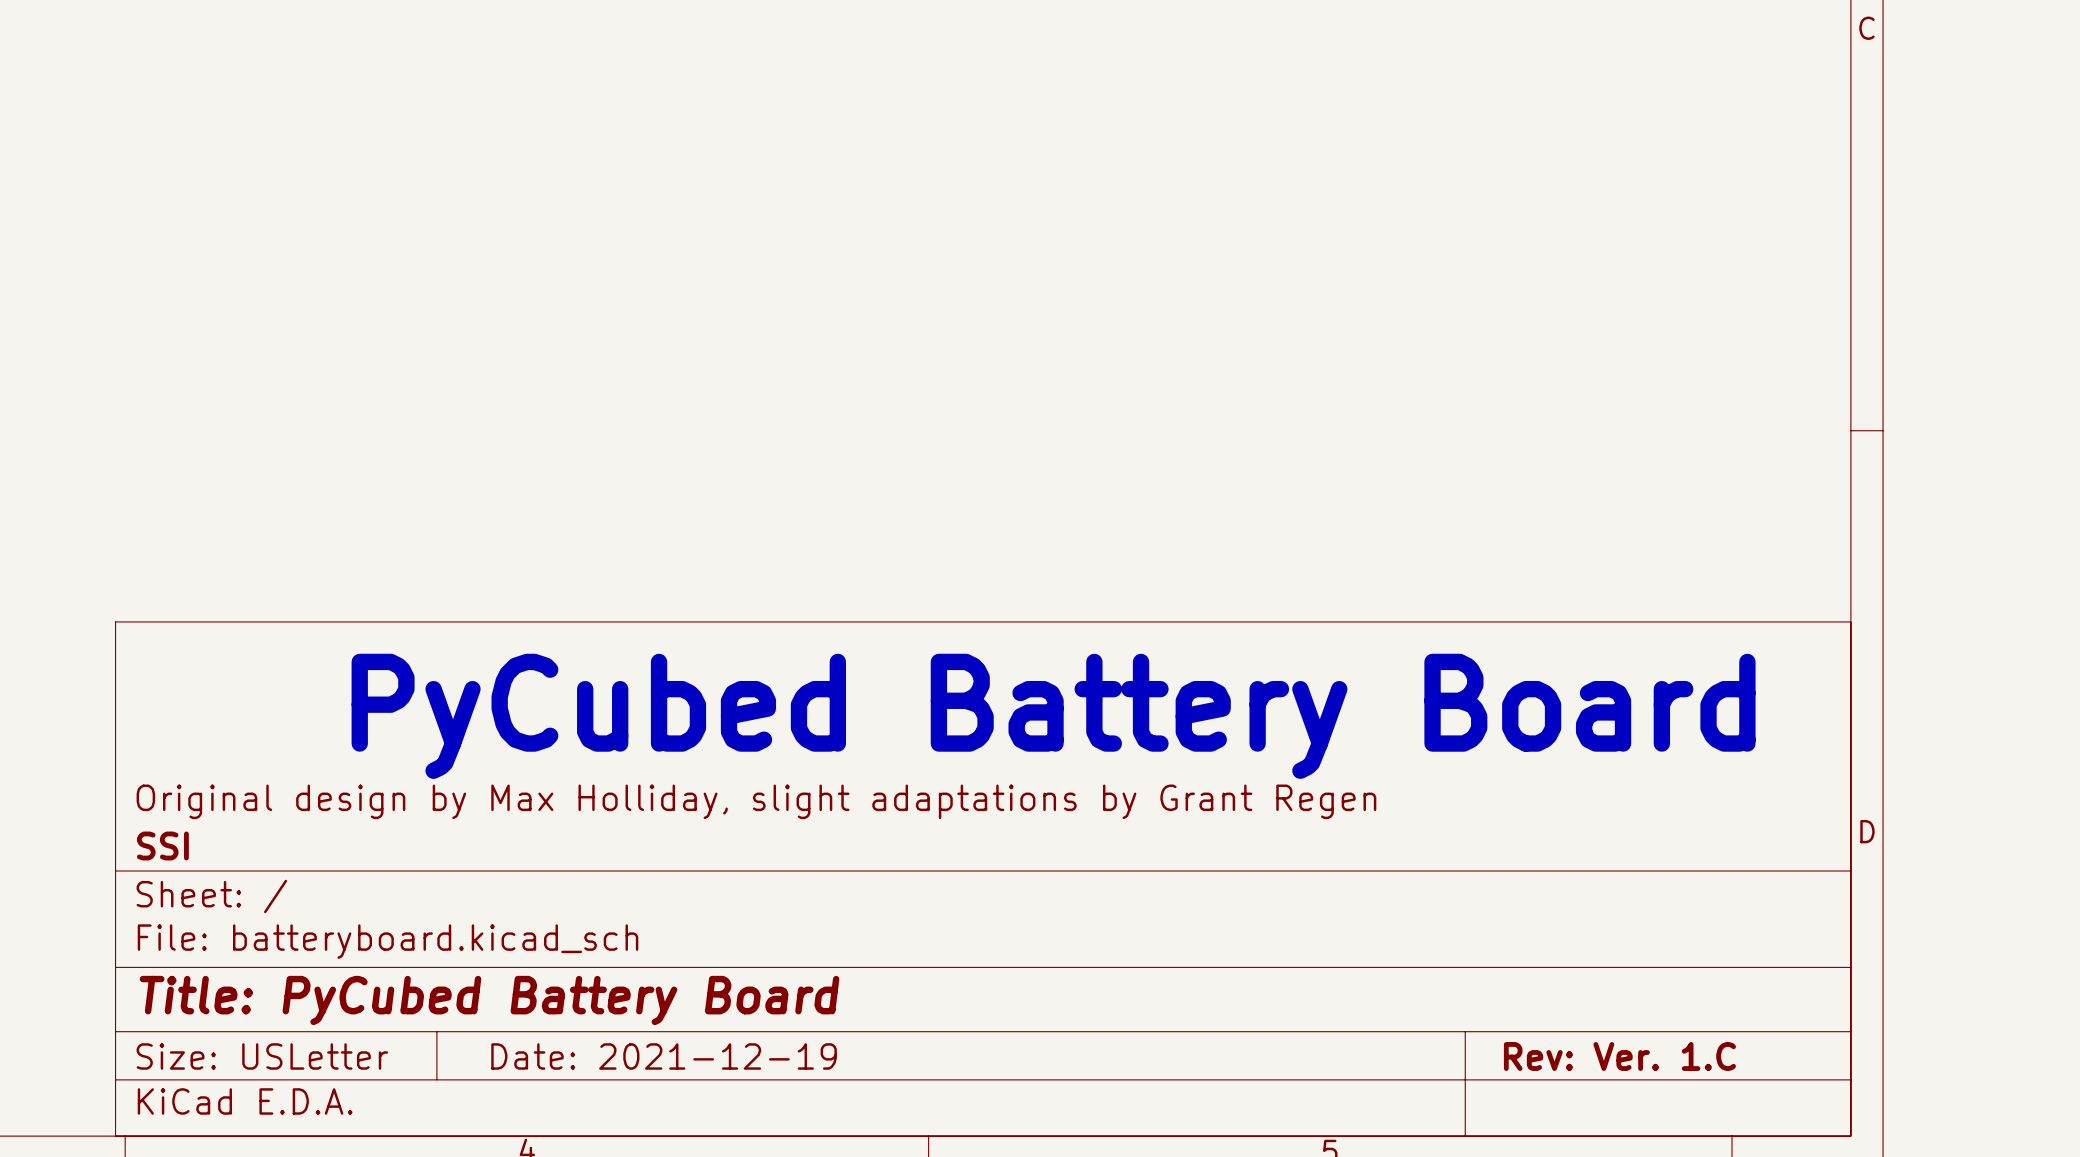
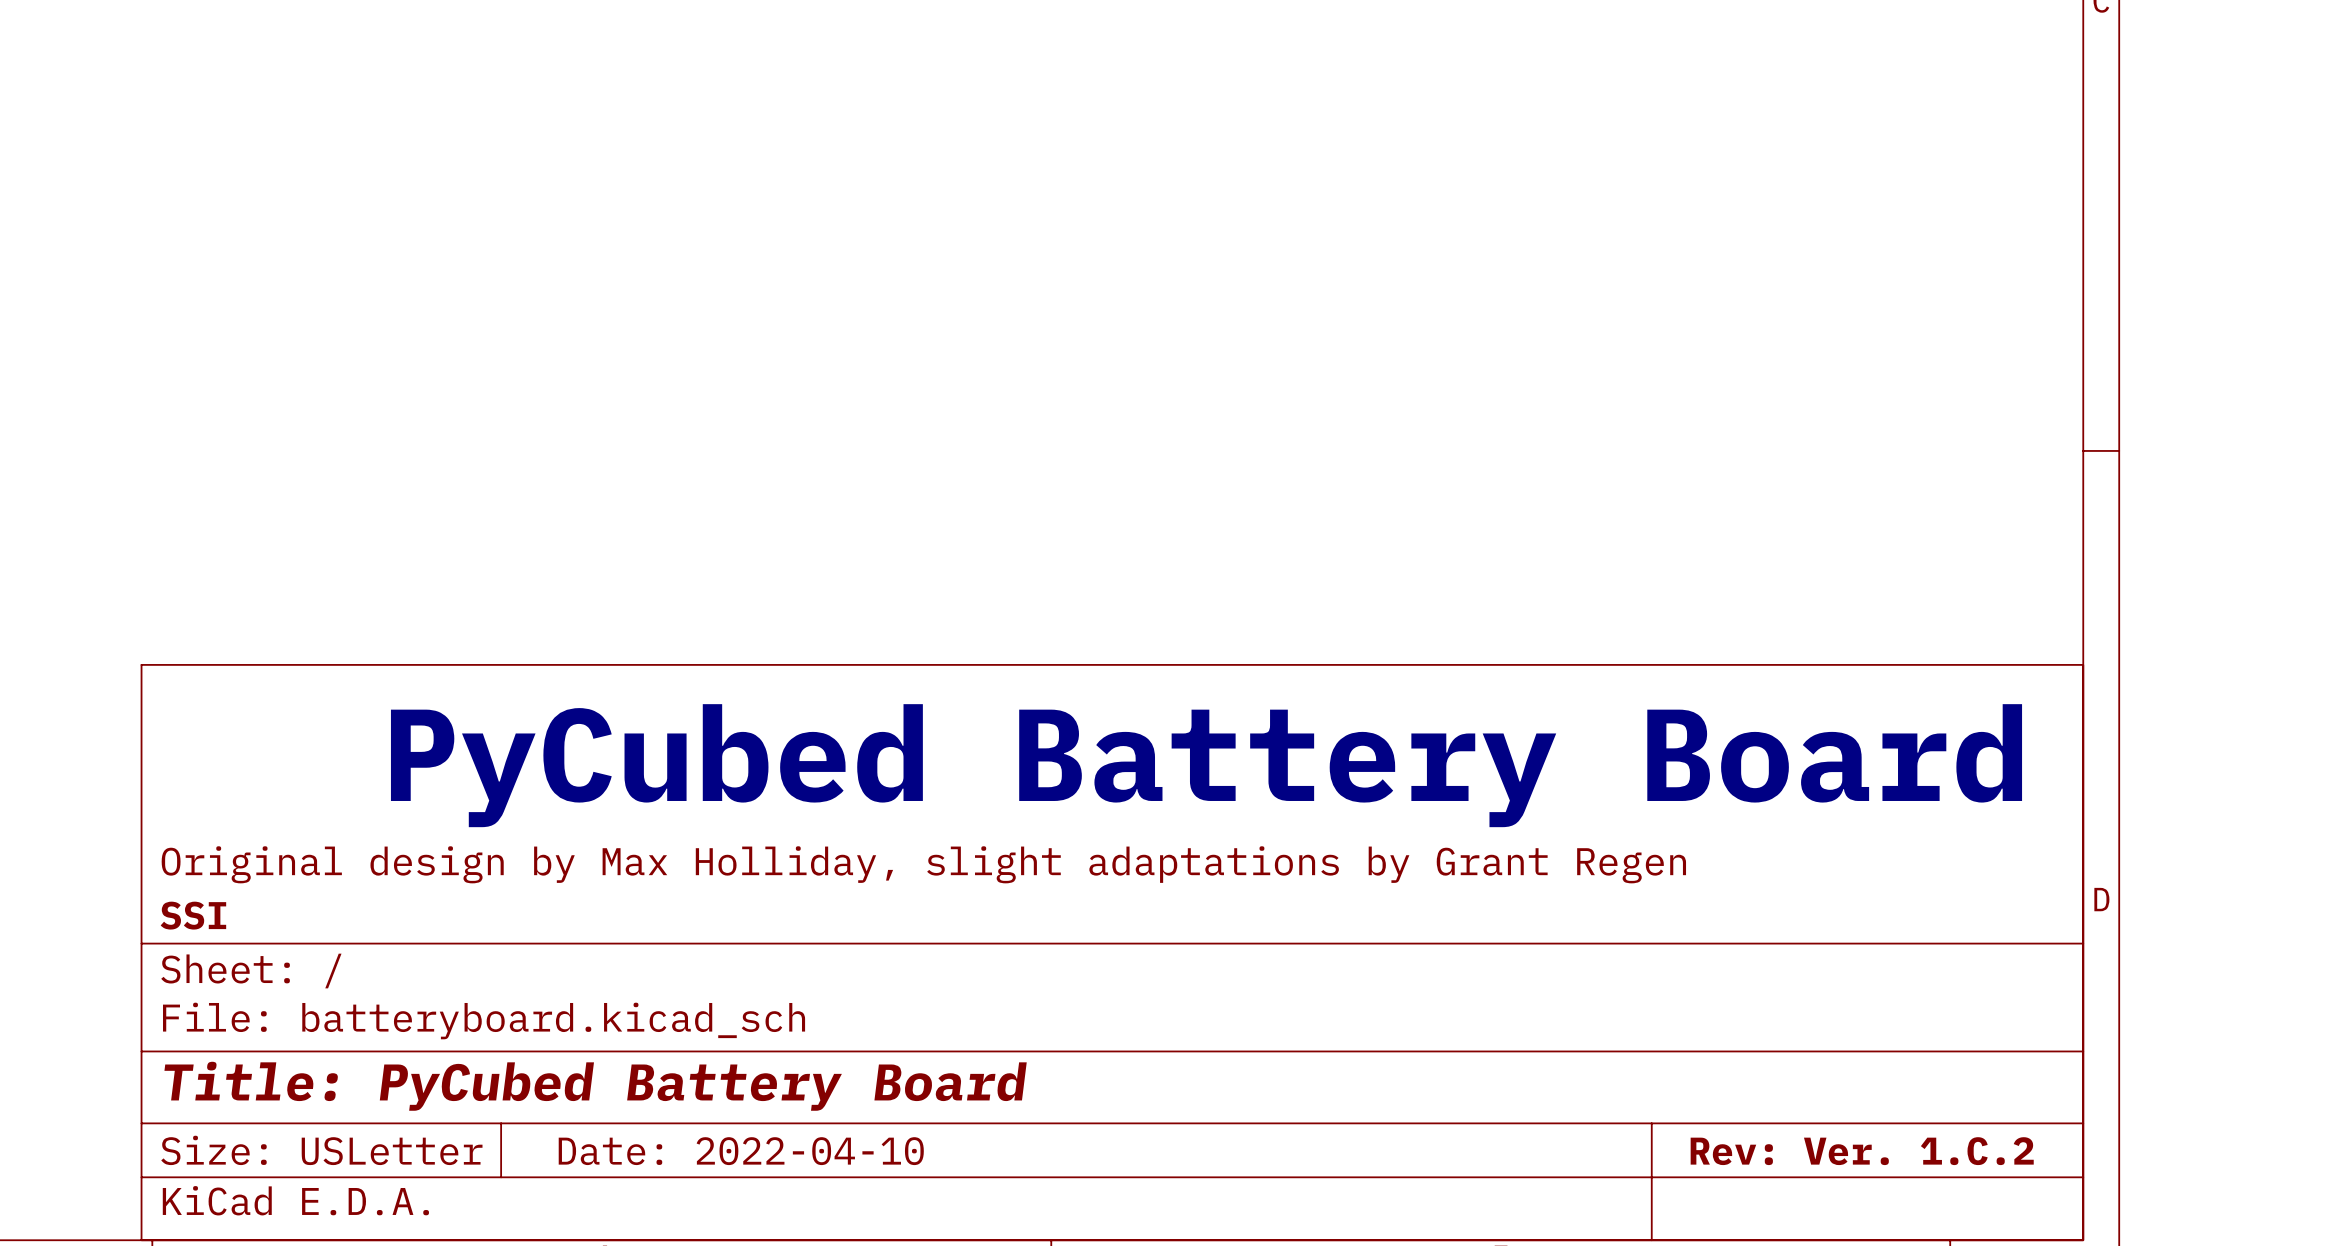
title block: Date: 2021-12-19 (664, 1056) -> Date: 2022-04-10 (741, 1151)
title block: Rev: Ver. 1.C (1619, 1056) -> Rev: Ver. 1.C.2 (1862, 1151)

